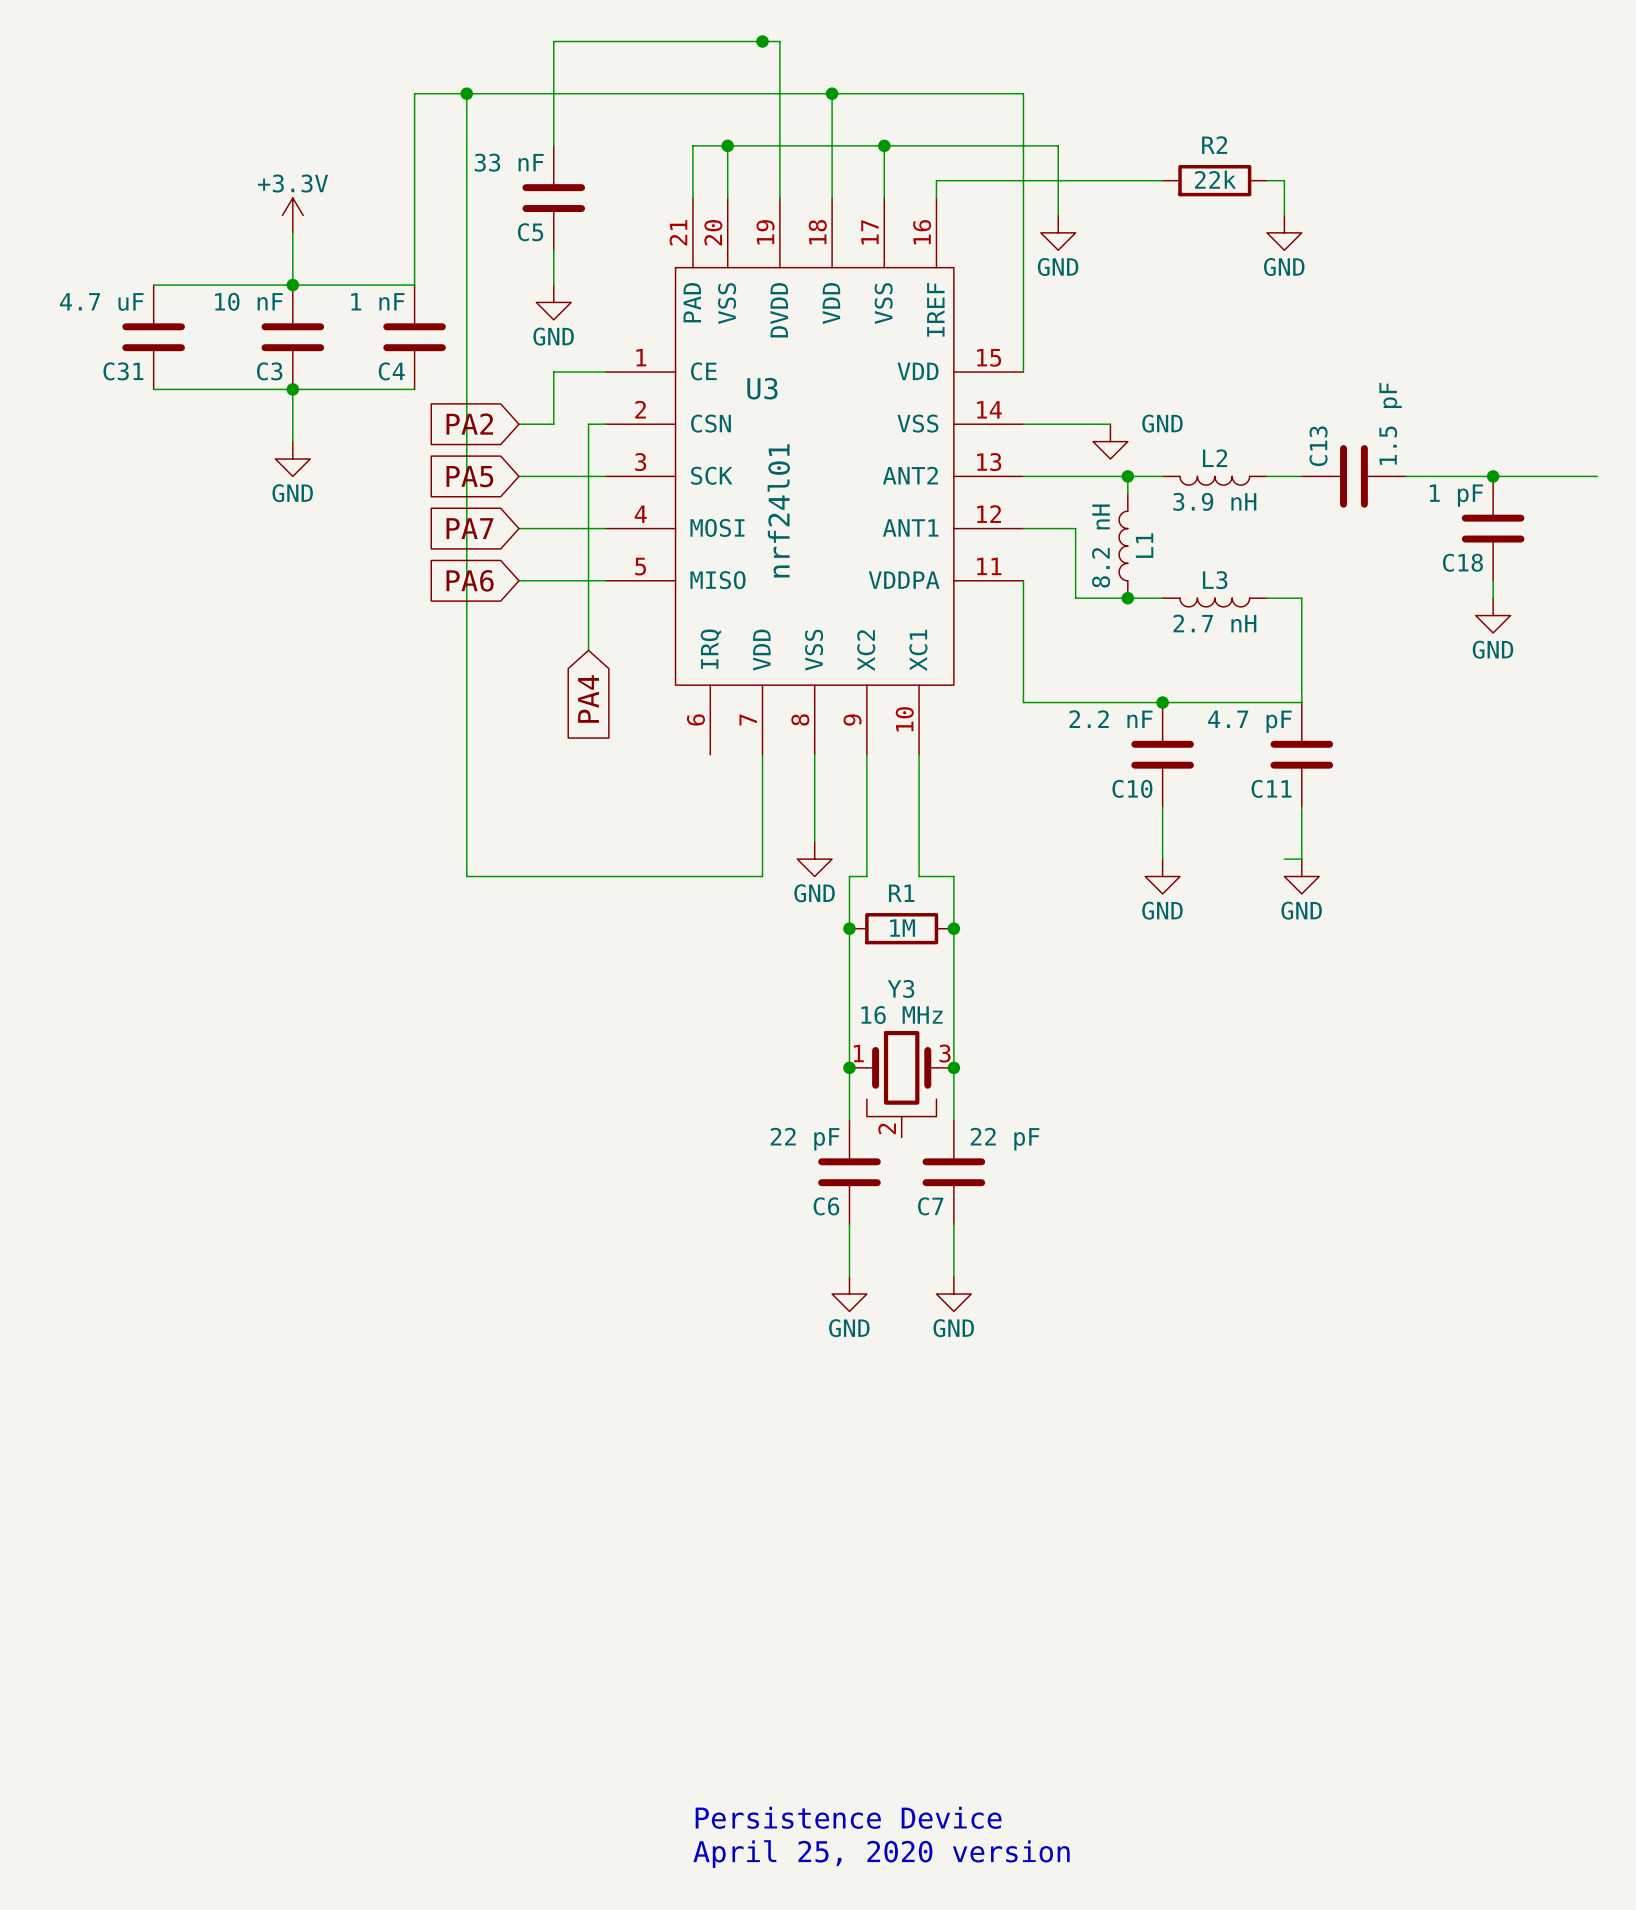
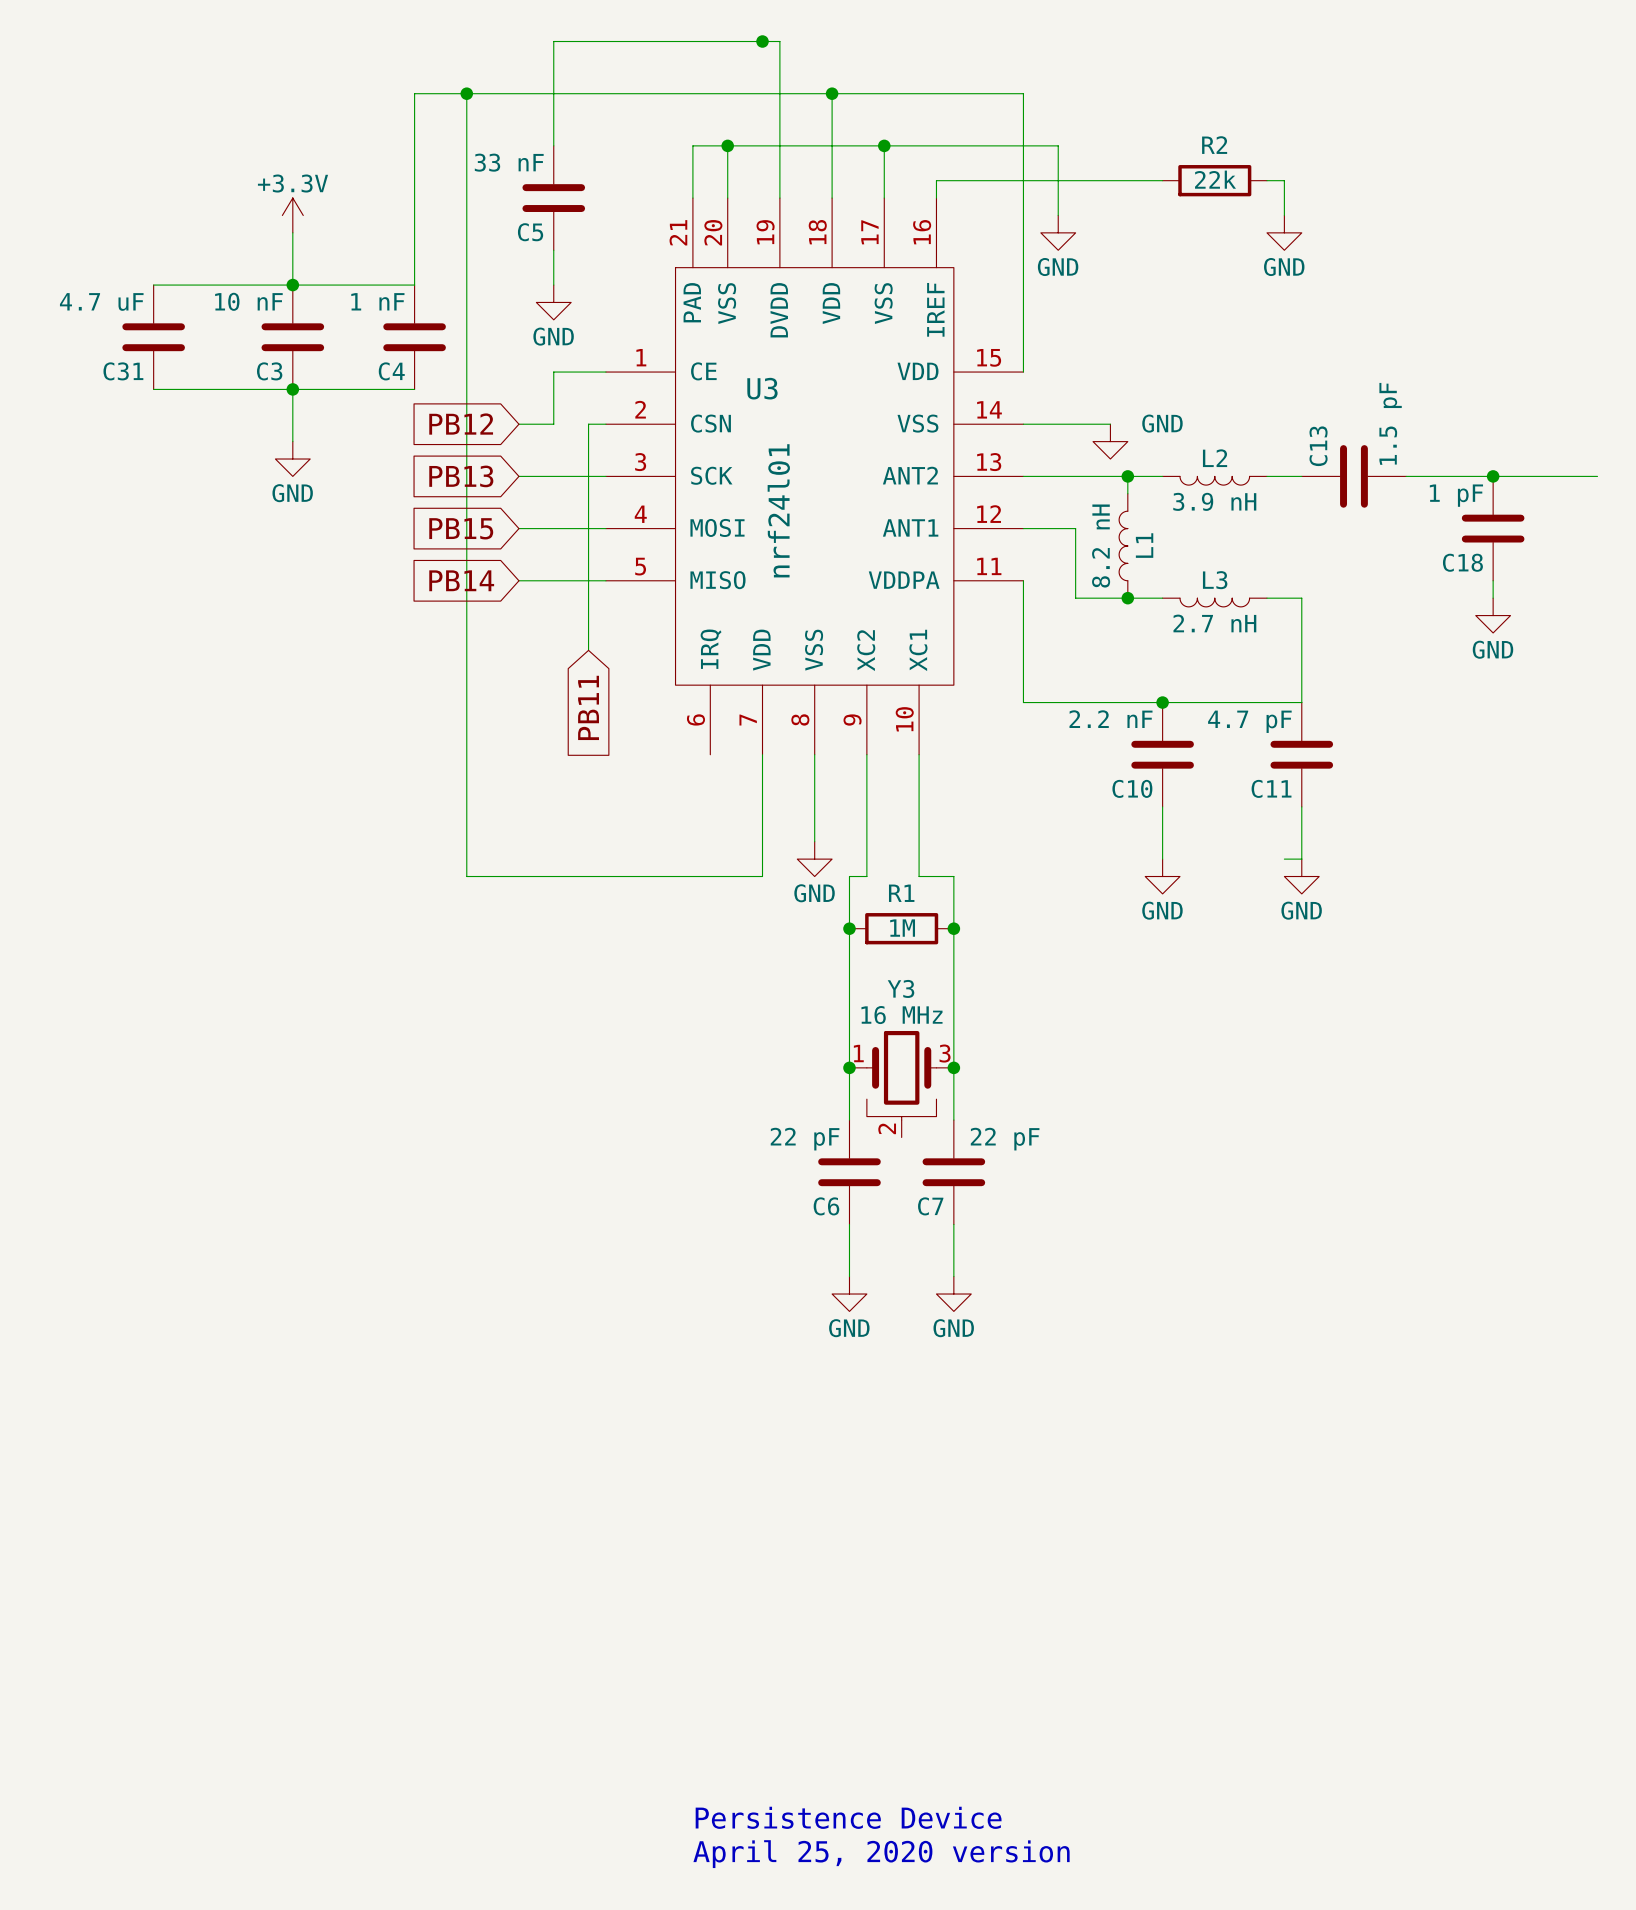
global label: PA2 (469, 424) -> PB12 (461, 424)
global label: PA5 (469, 476) -> PB13 (461, 476)
global label: PA7 (469, 528) -> PB15 (461, 528)
global label: PA6 (470, 580) -> PB14 (461, 580)
global label: PA4 (588, 699) -> PB11 (588, 707)

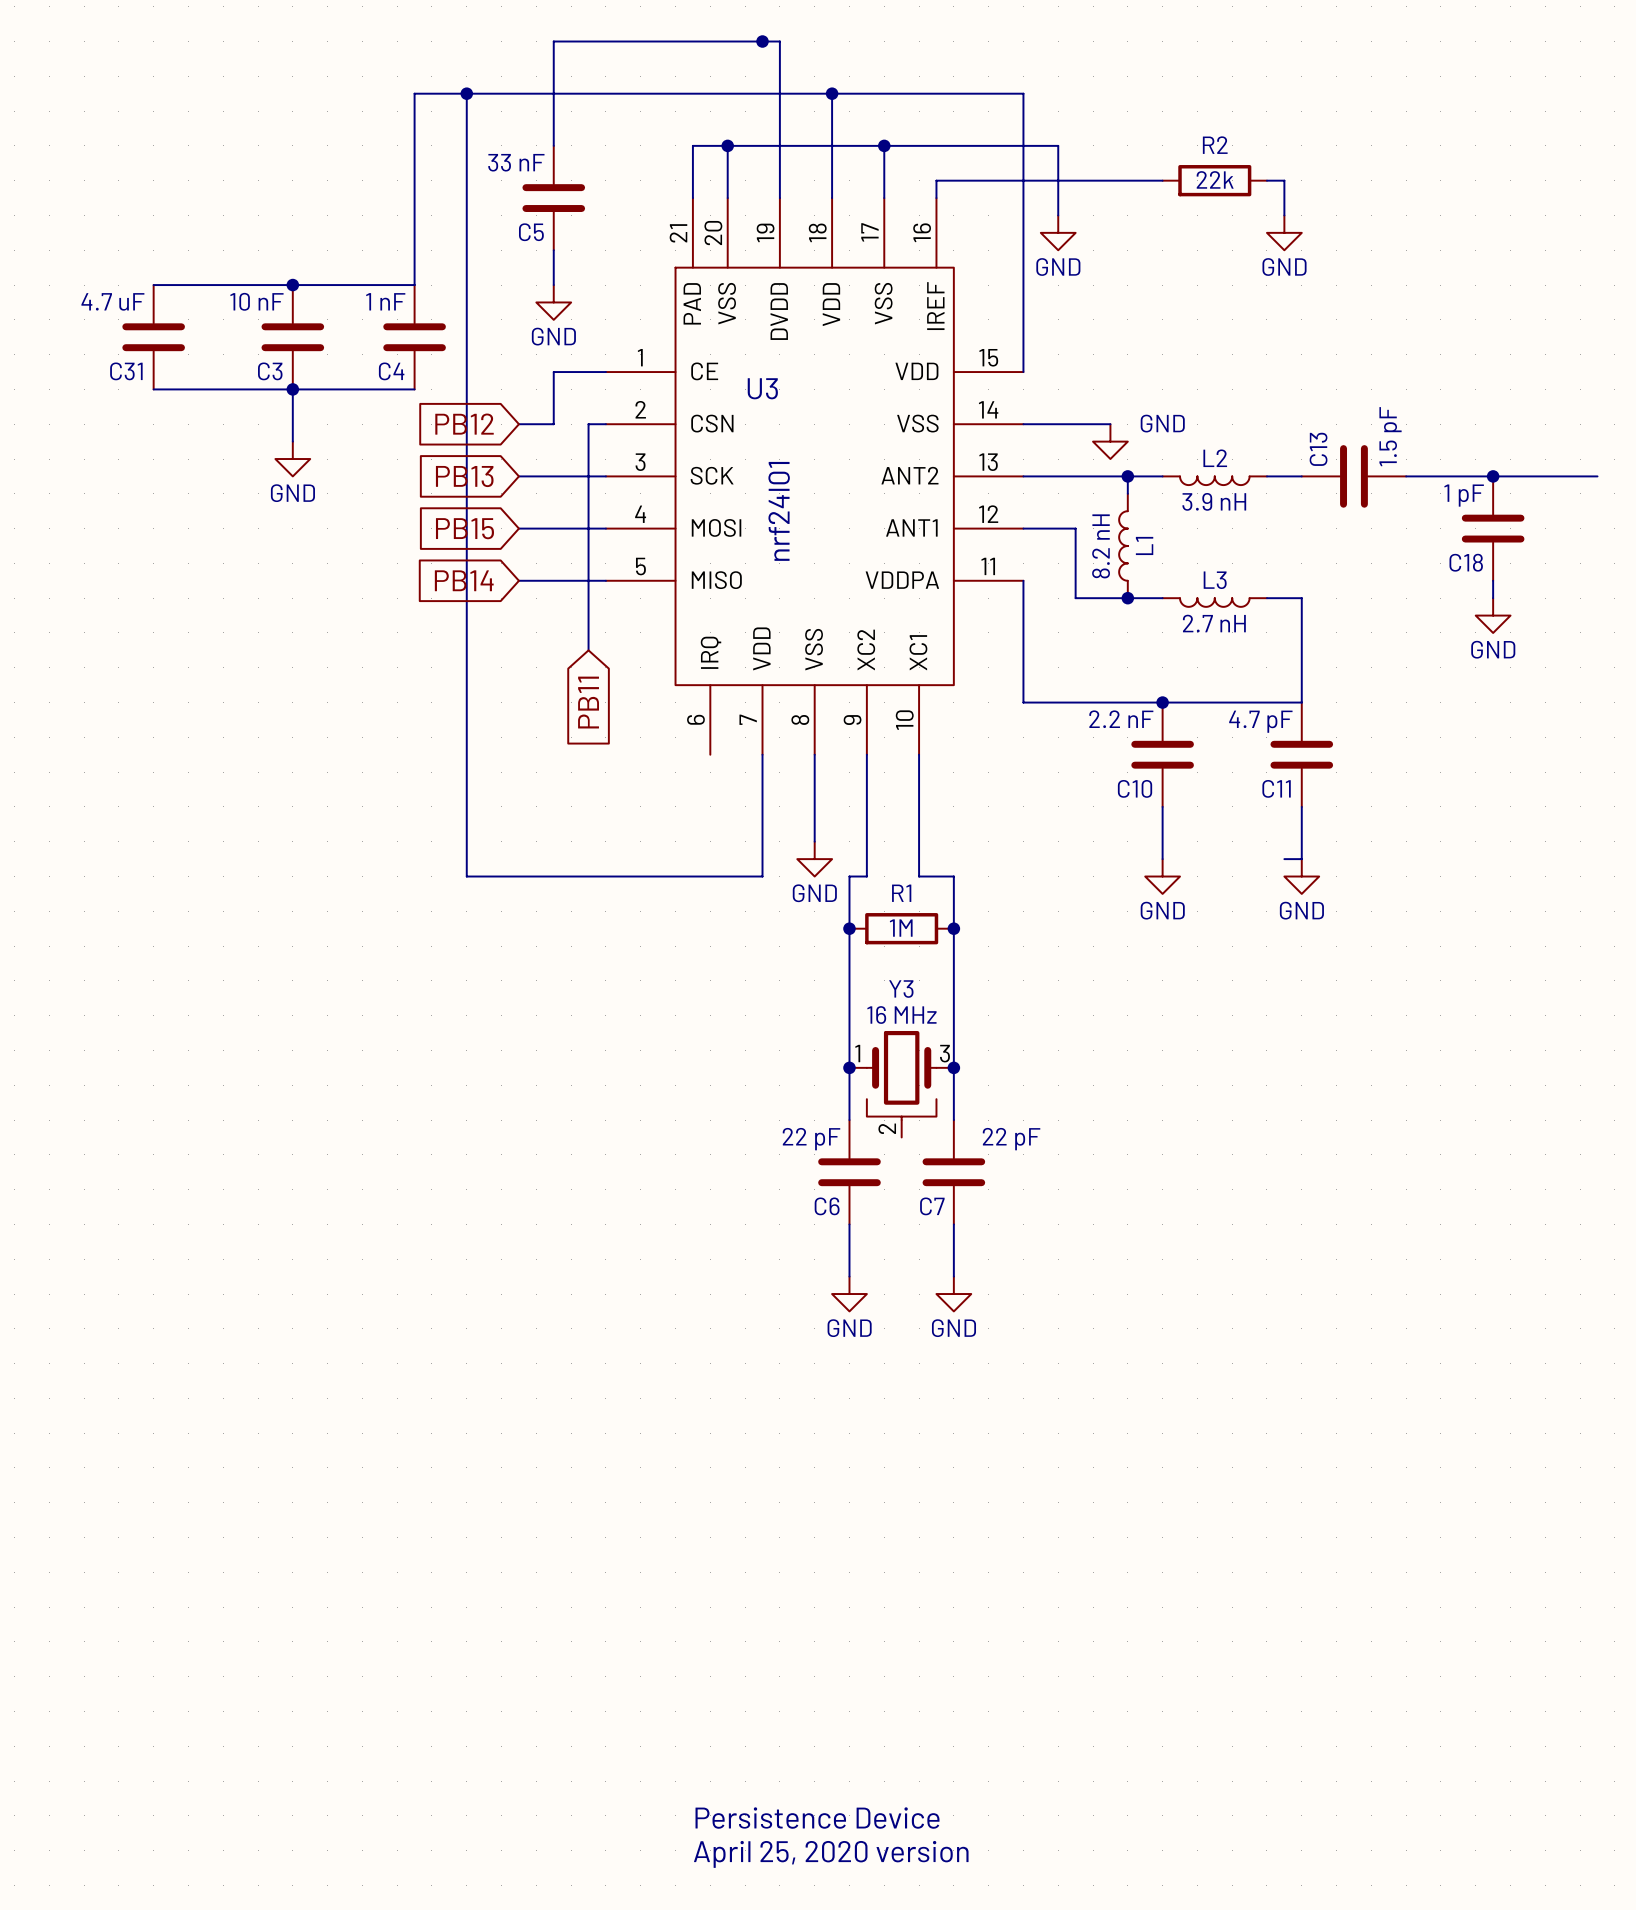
power symbol: +3.3V (292, 215) -> none
wire: (292, 232) (292, 285) -> none

